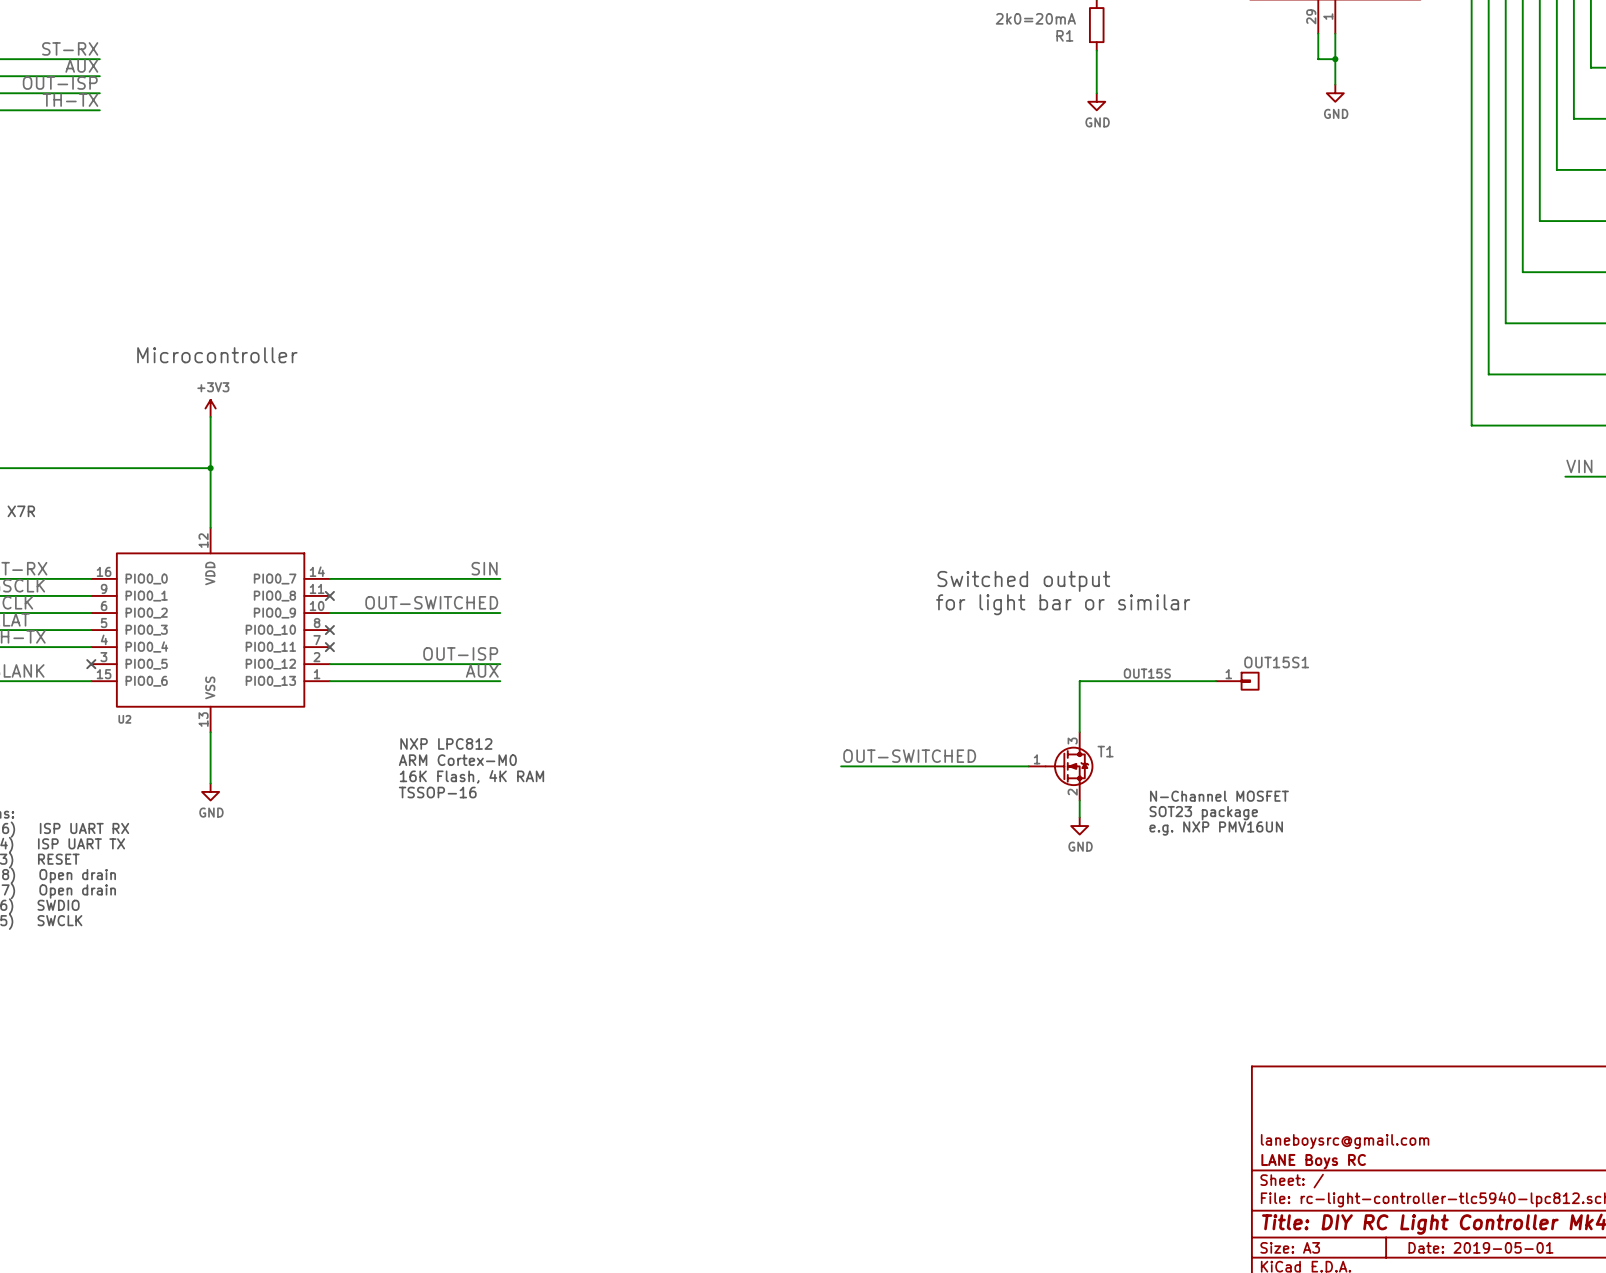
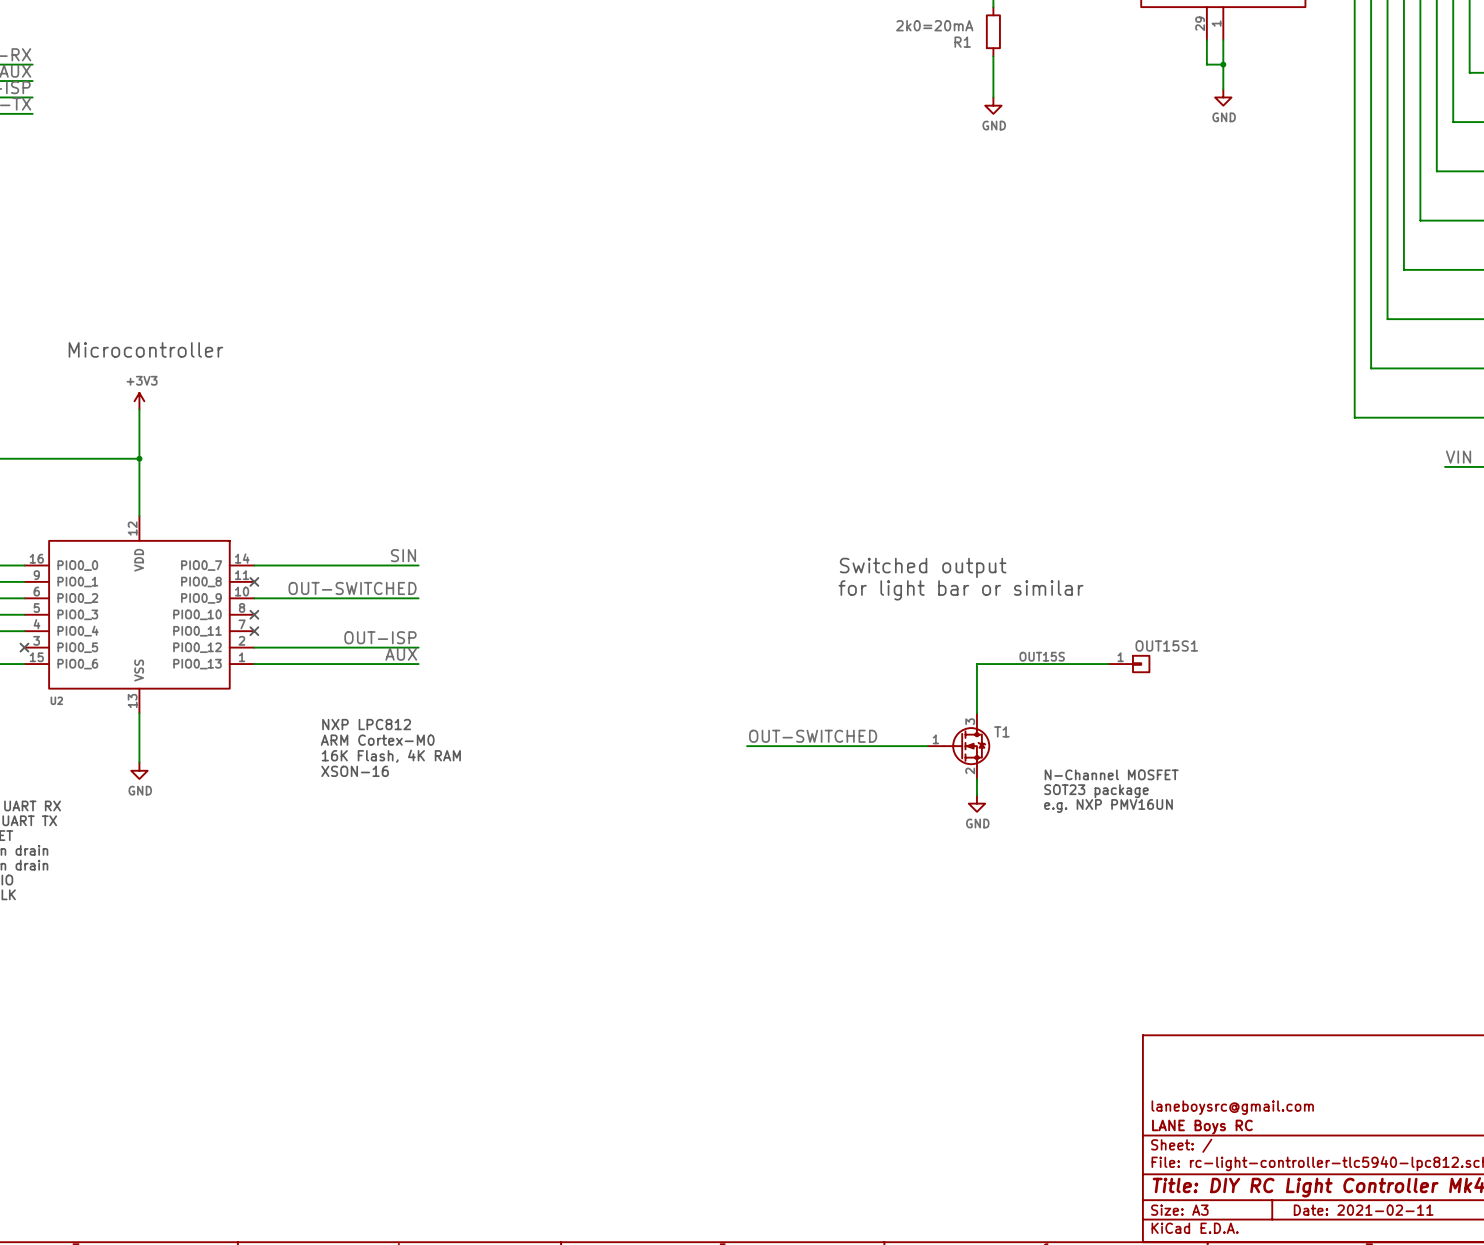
text: TSSOP-16 (437, 792) -> XSON-16 (355, 771)
title block: Date: 2019-05-01 (1480, 1247) -> Date: 2021-02-11 (1363, 1210)

